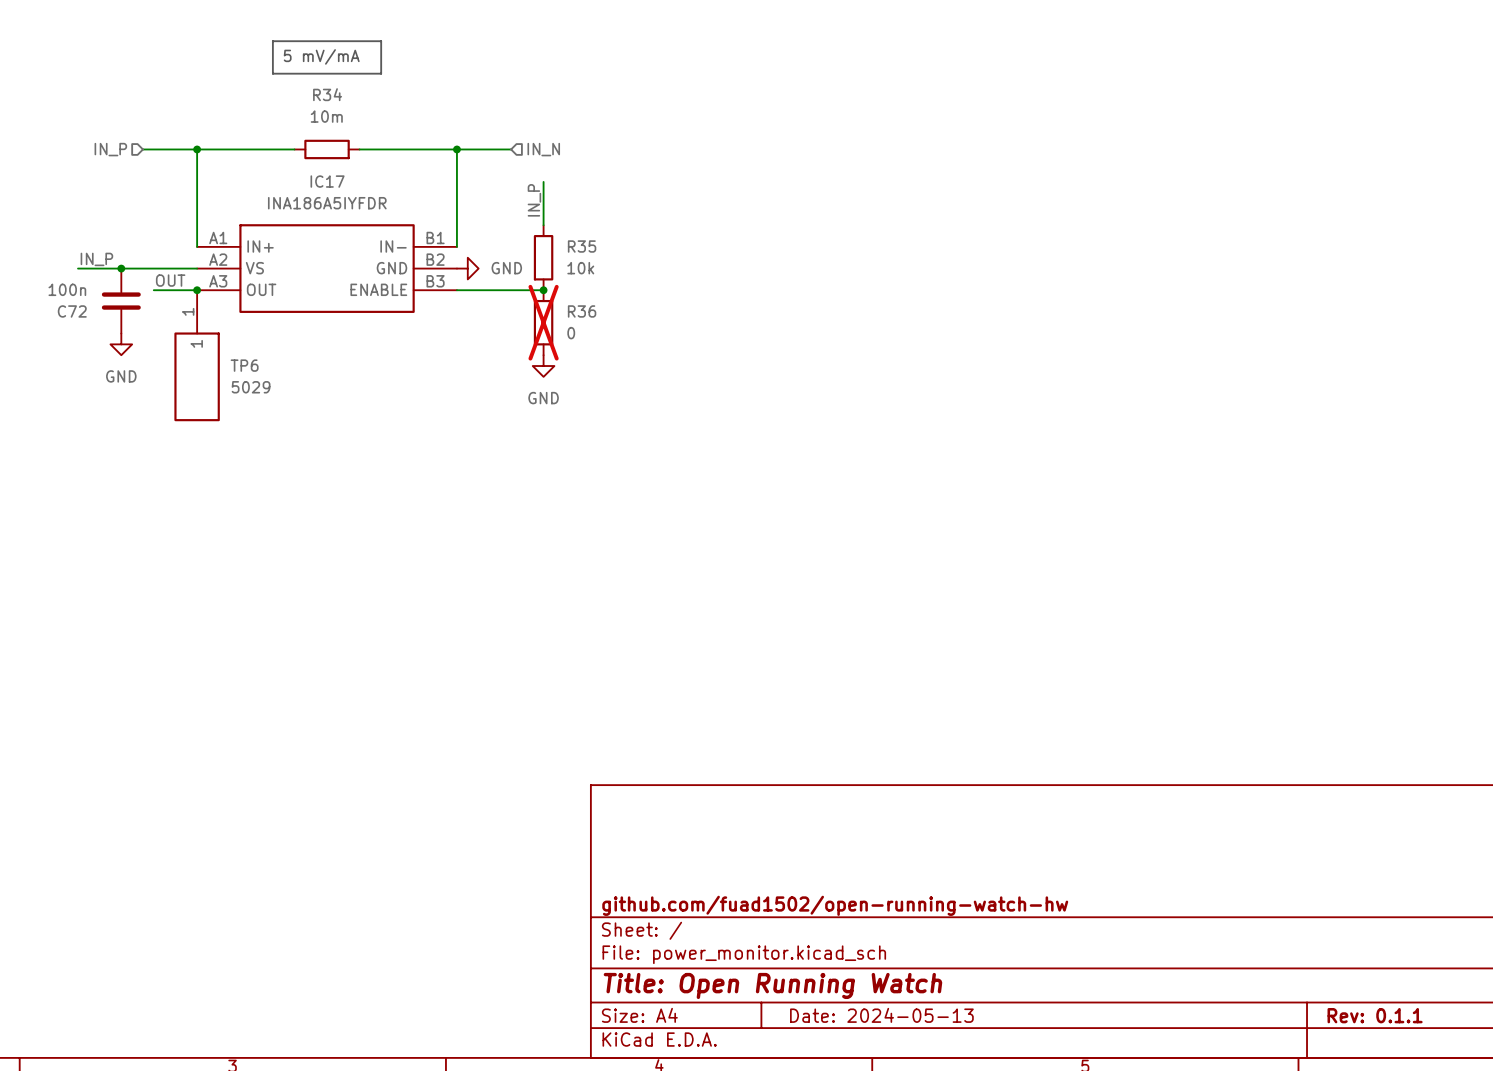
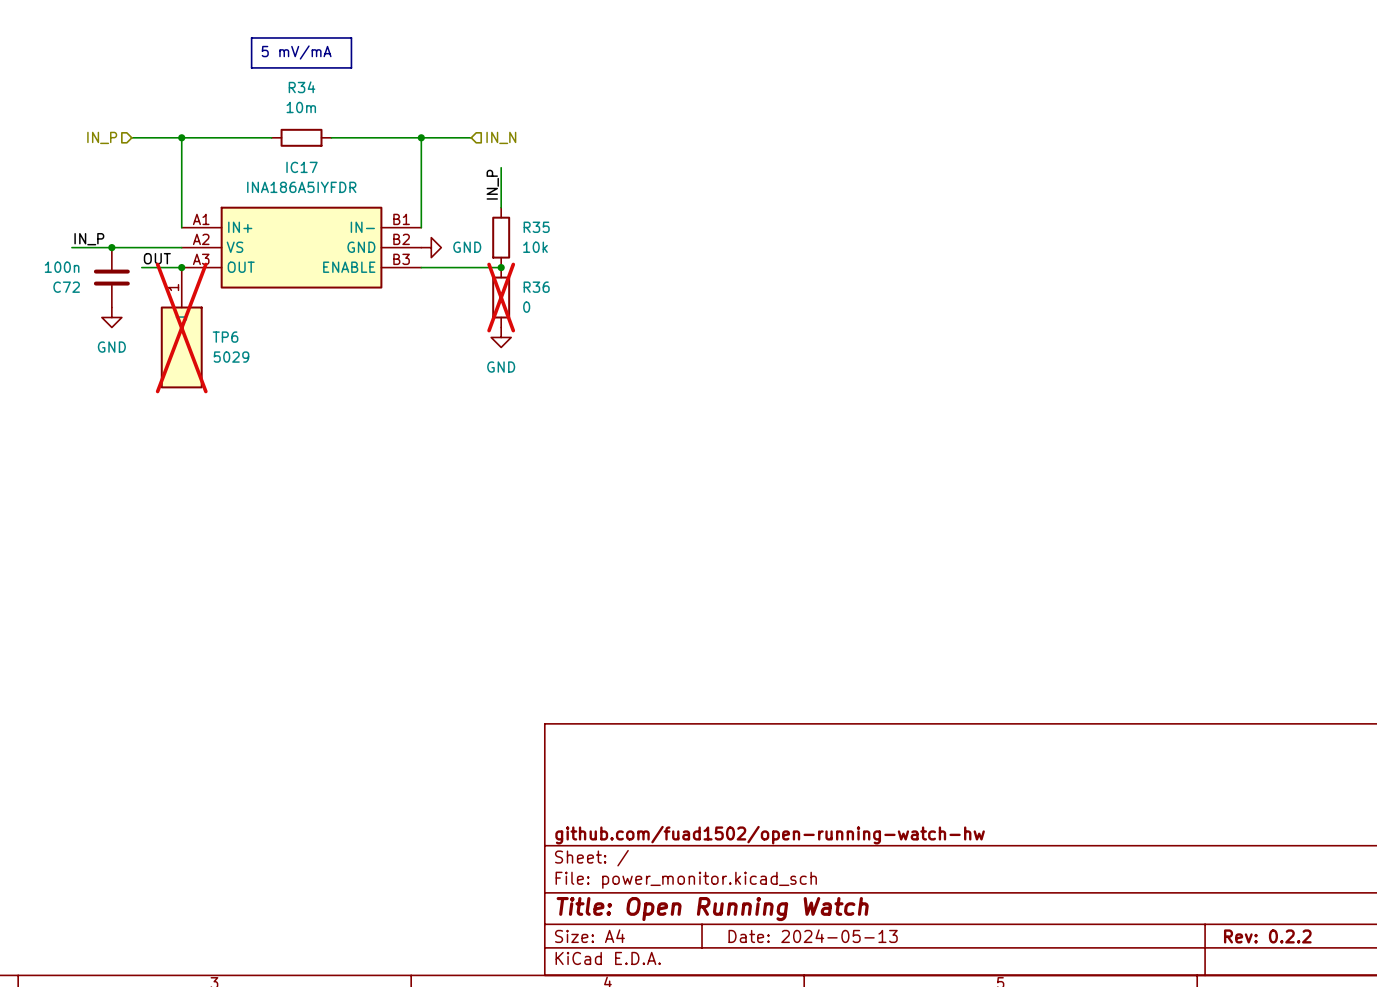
TP6 do-not-place cross: none -> (181, 327)
title block: Rev: 0.1.1 (1375, 1015) -> Rev: 0.2.2 (1267, 936)

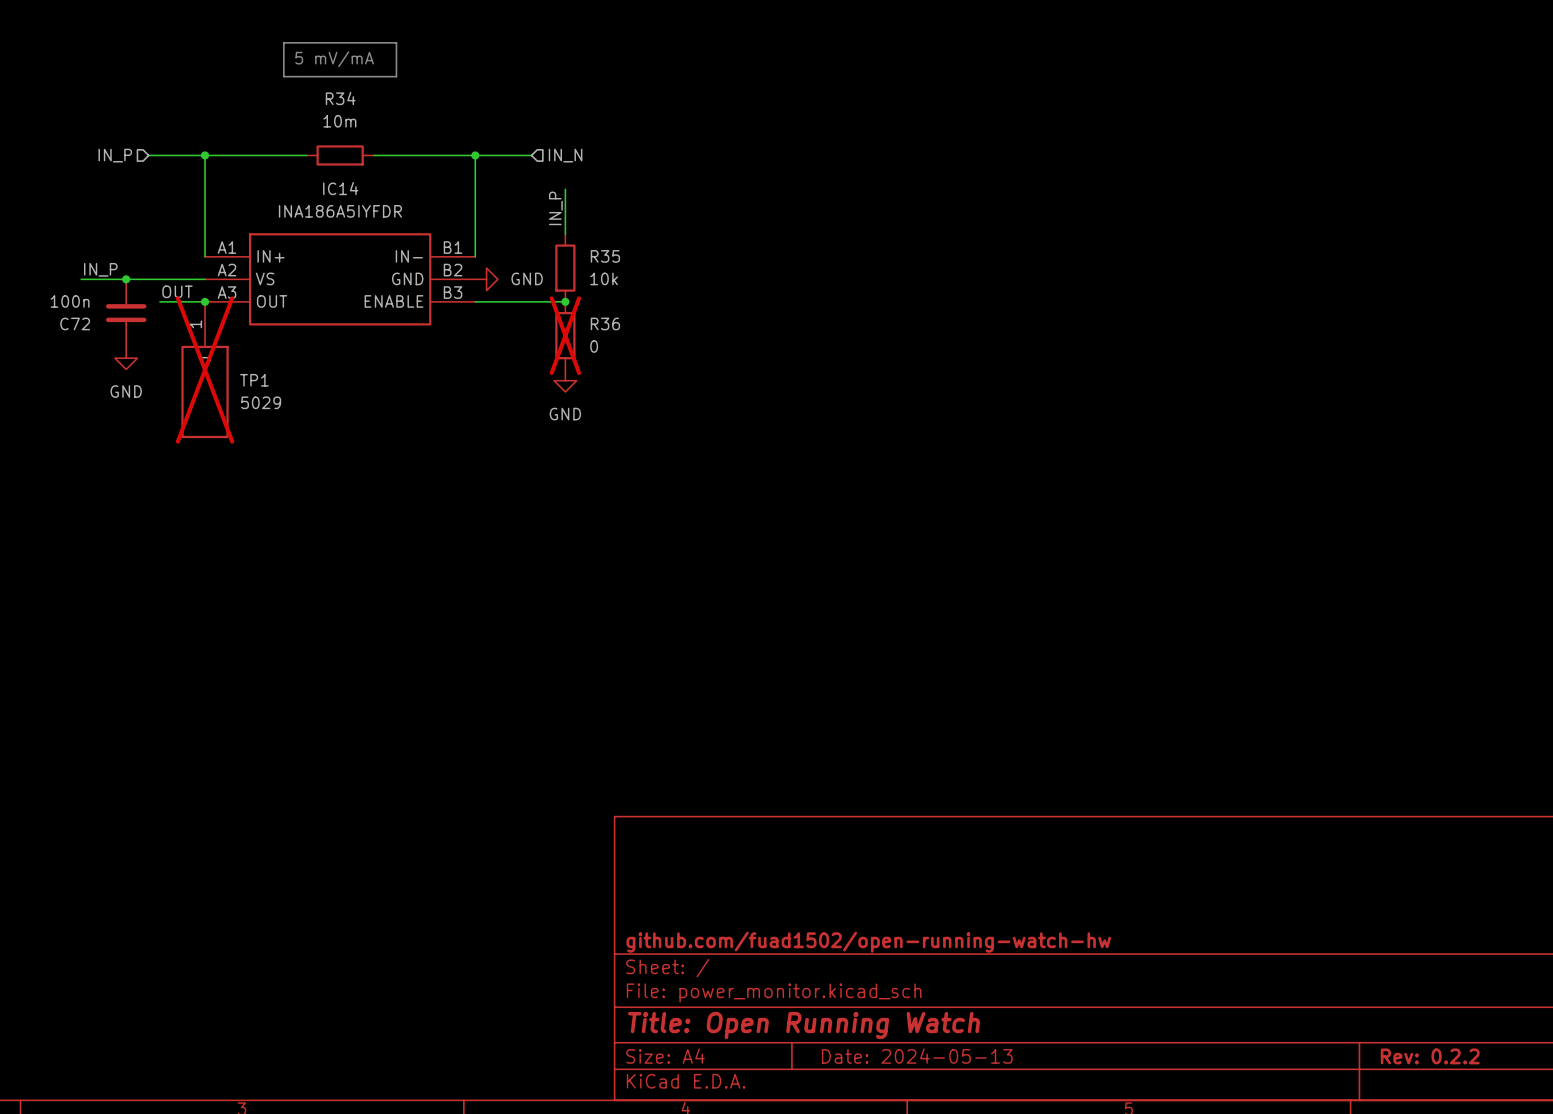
IC17 name: IC17 (302, 167) -> IC14 (340, 188)
TP6 name: TP6 (225, 337) -> TP1 (254, 380)

